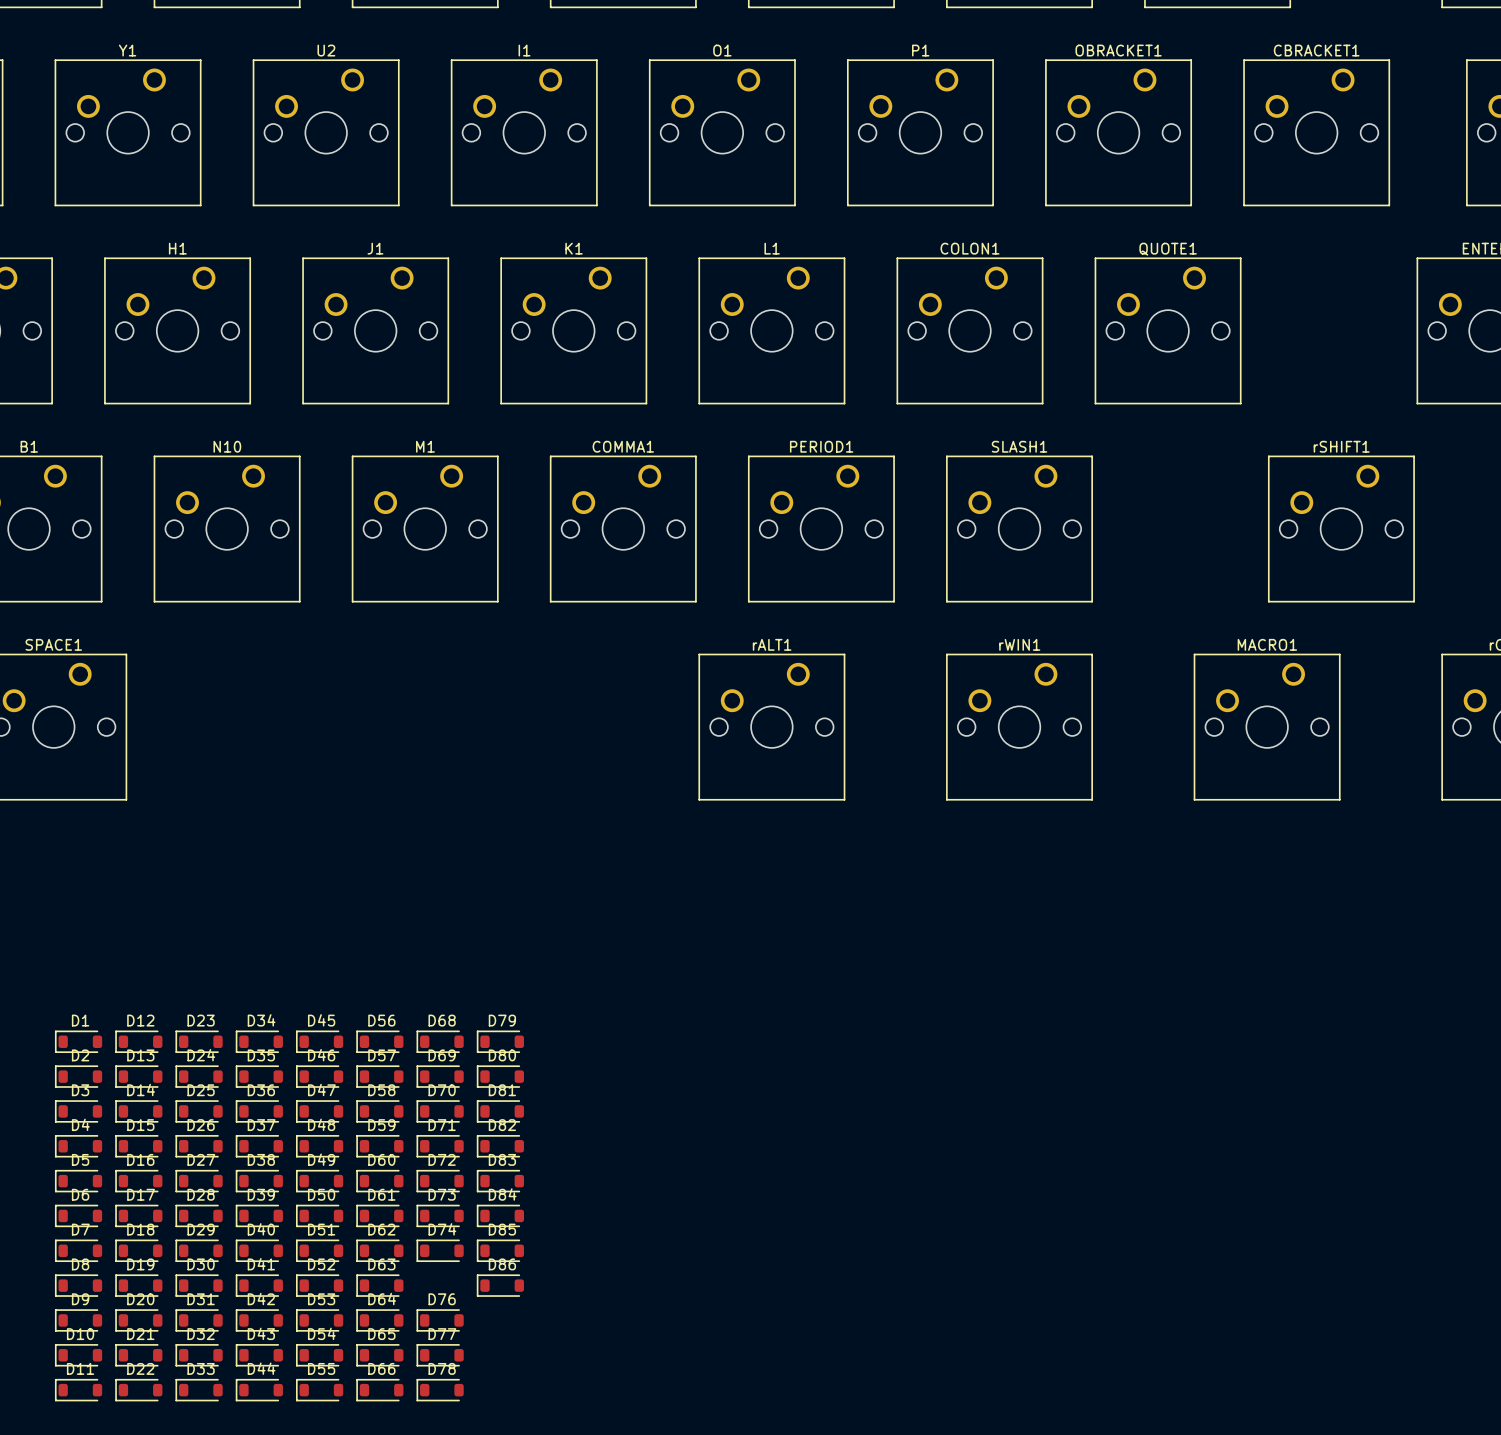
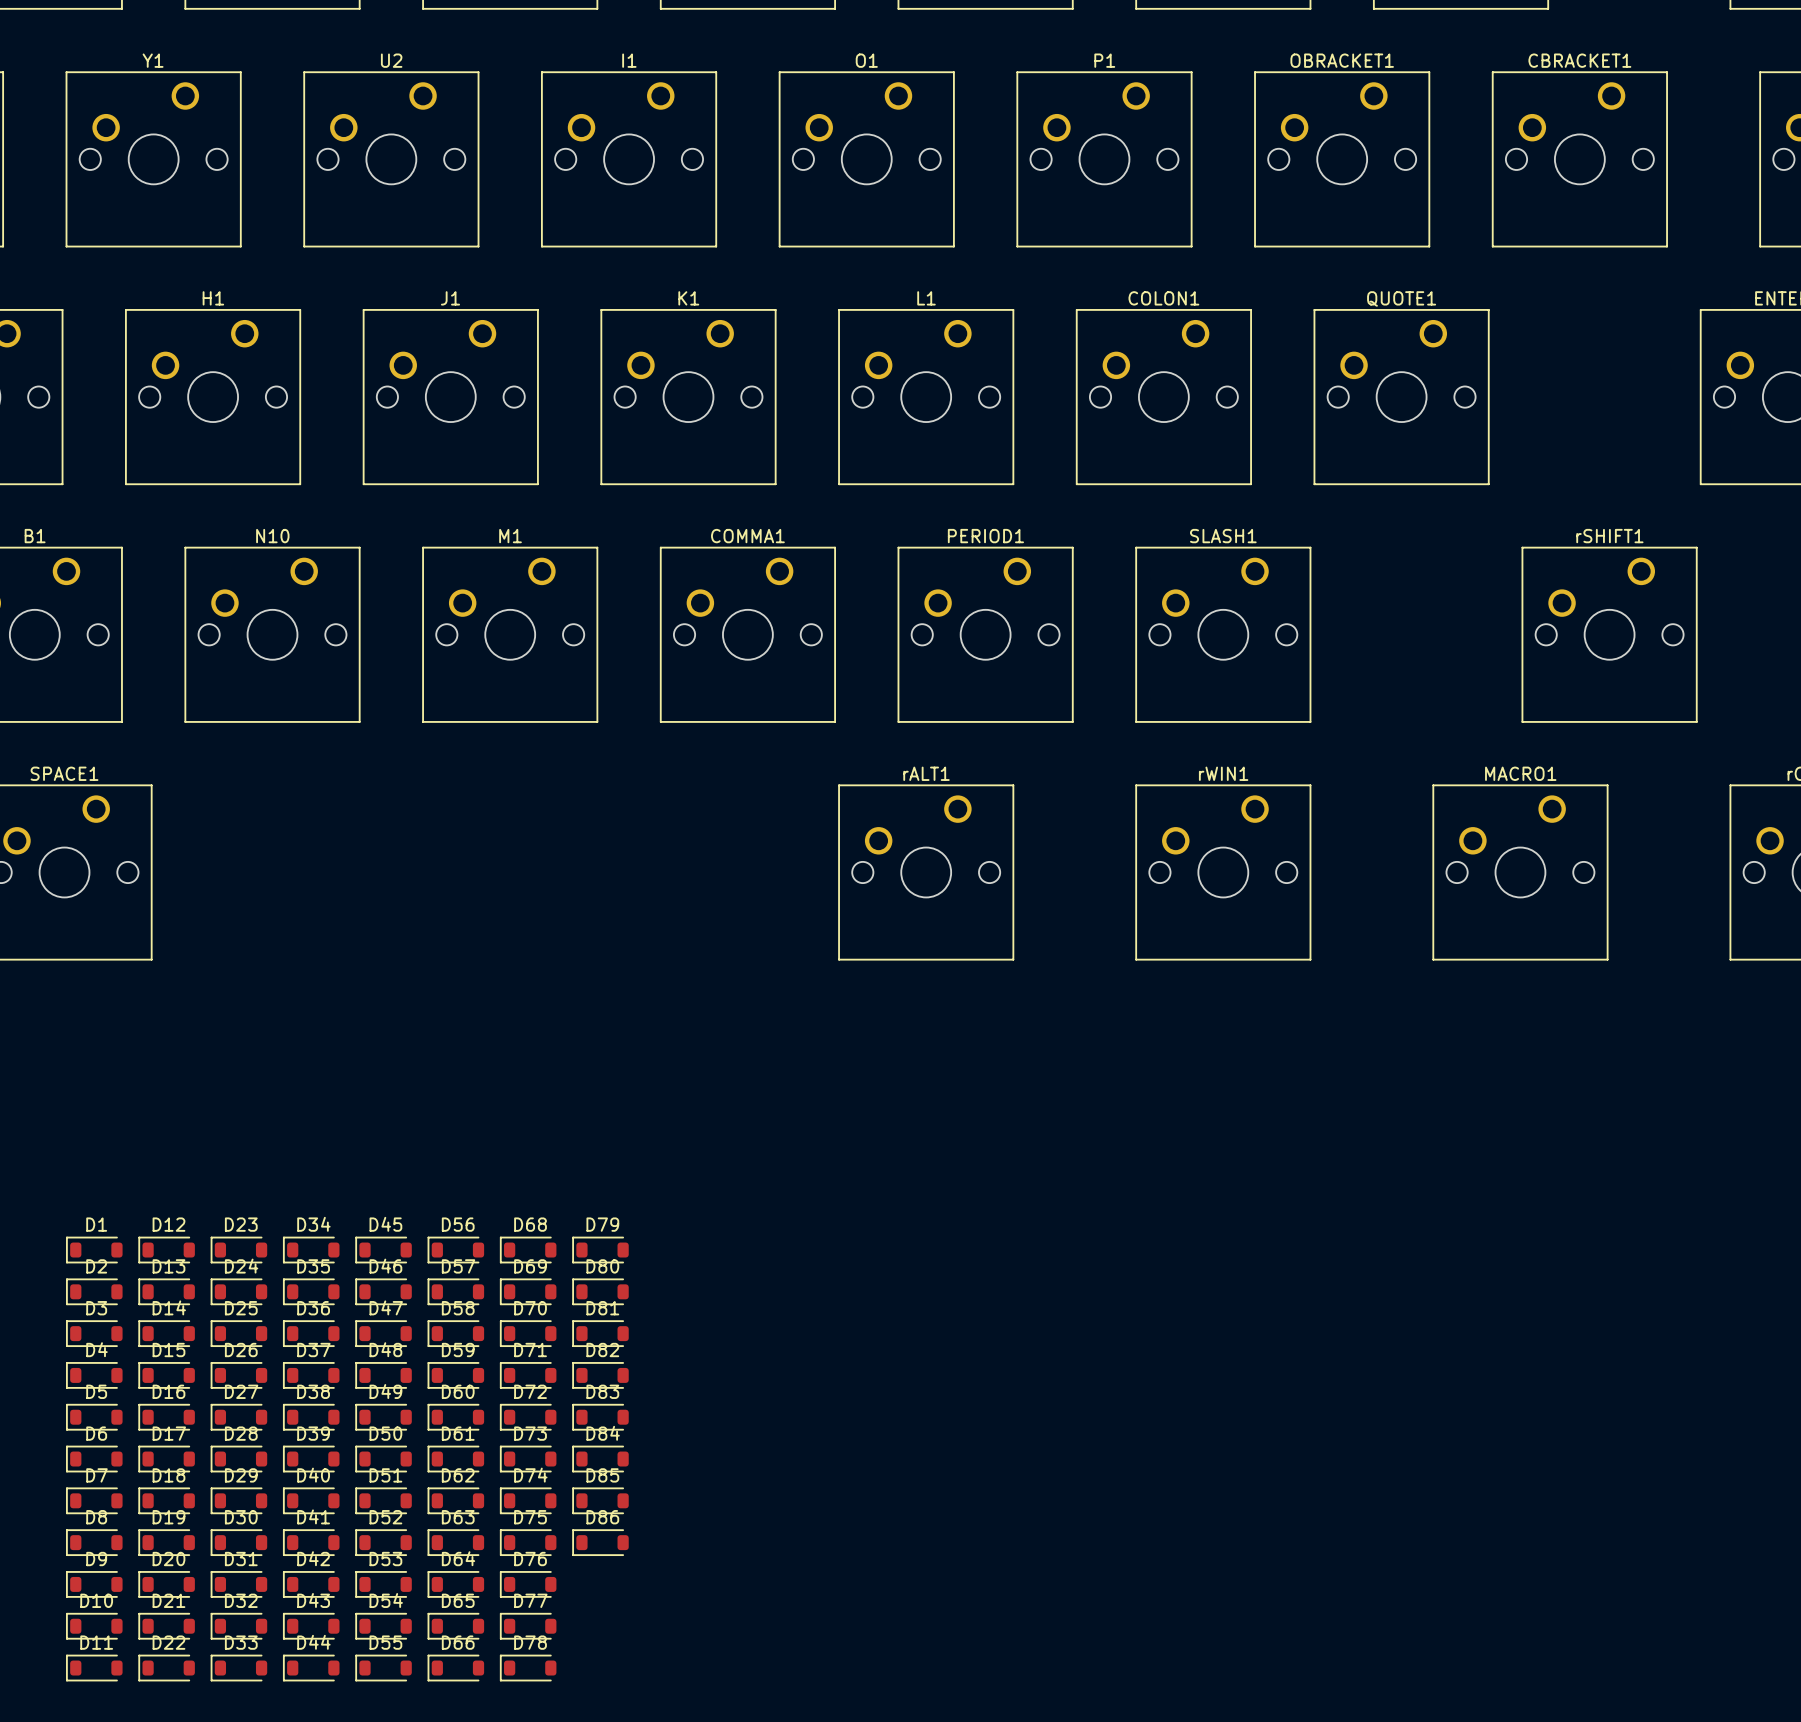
D75: none -> (528, 1542)

